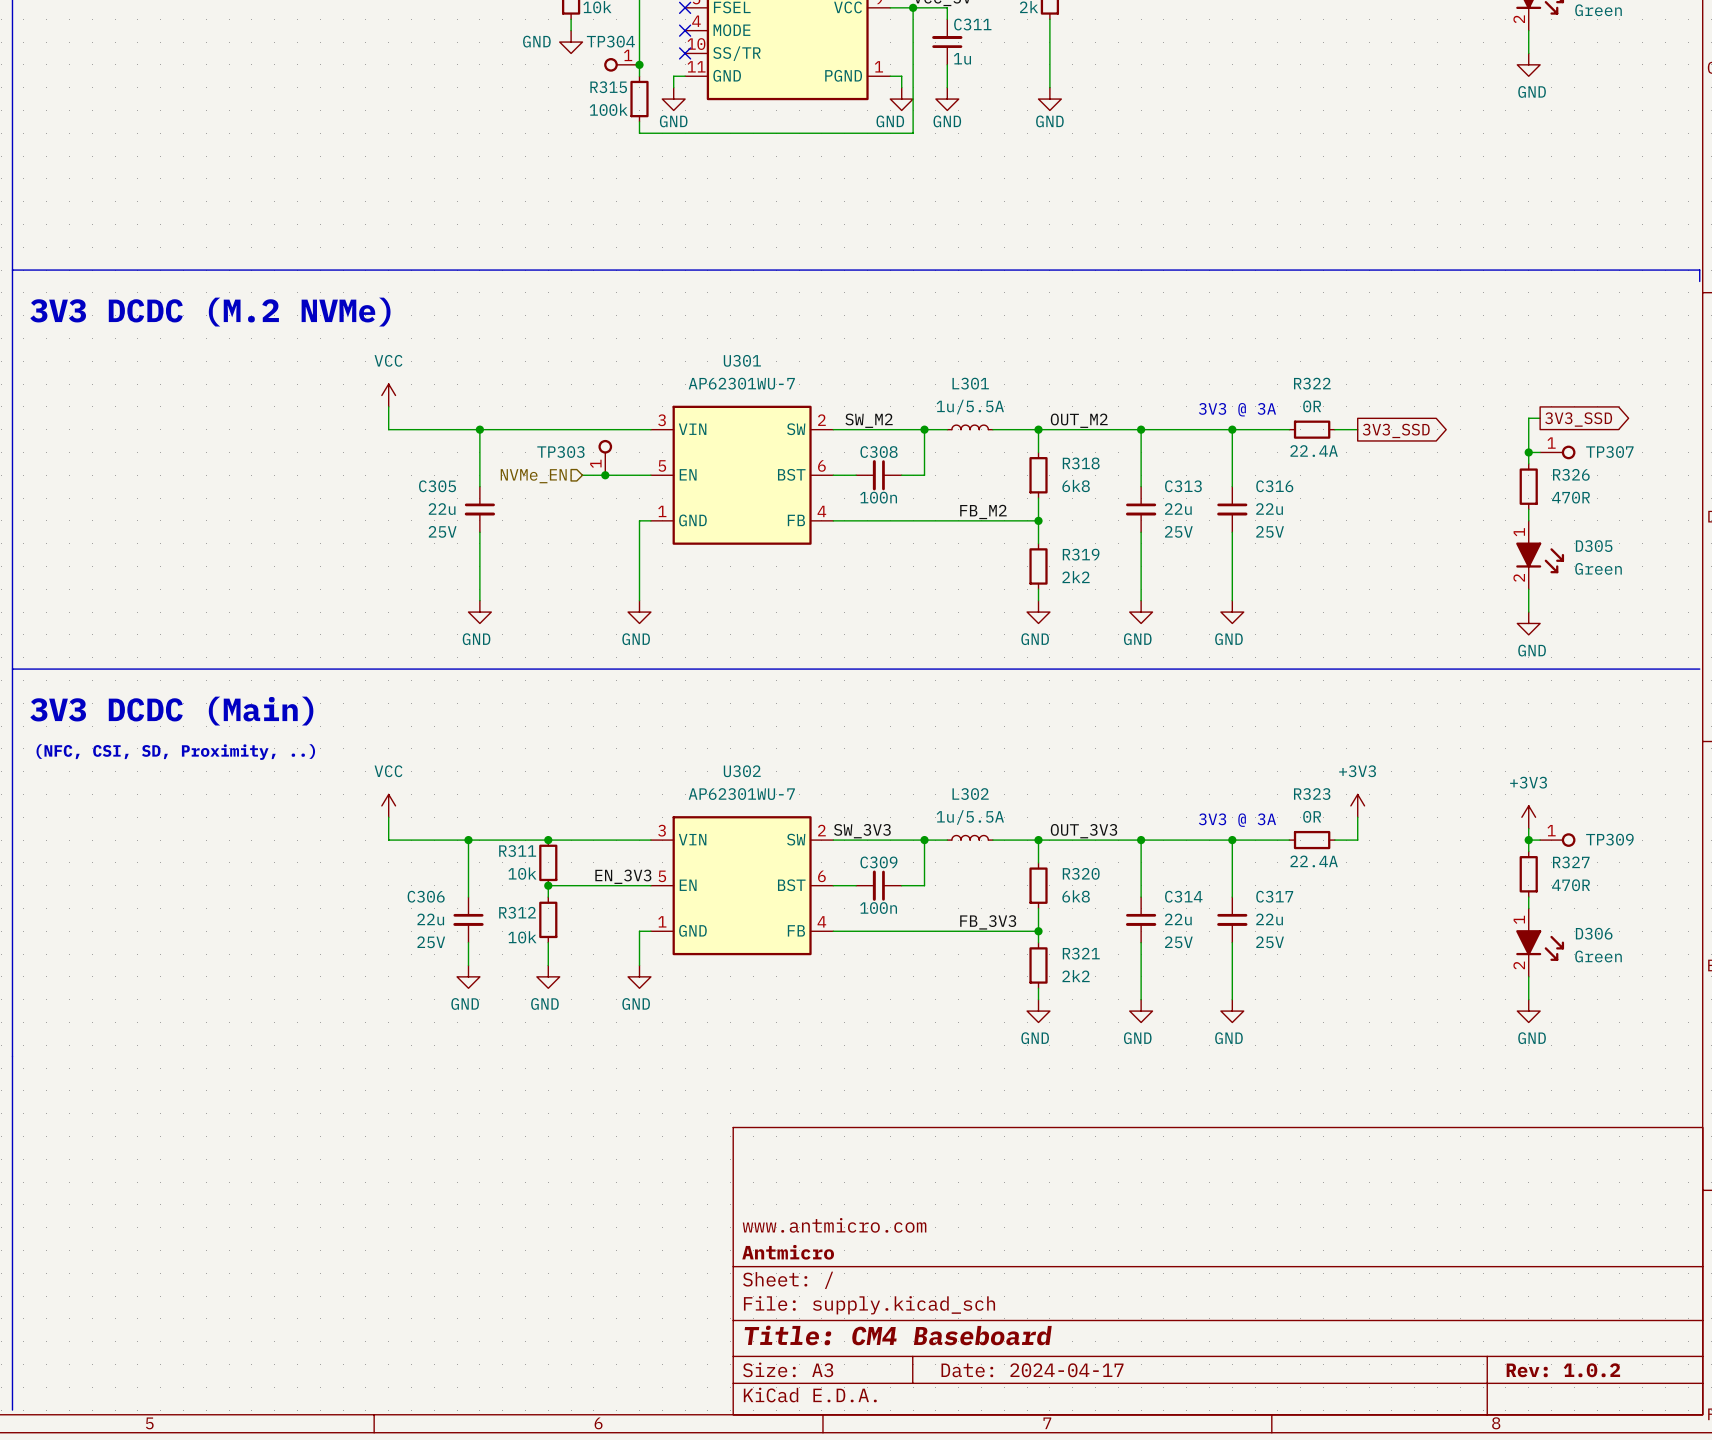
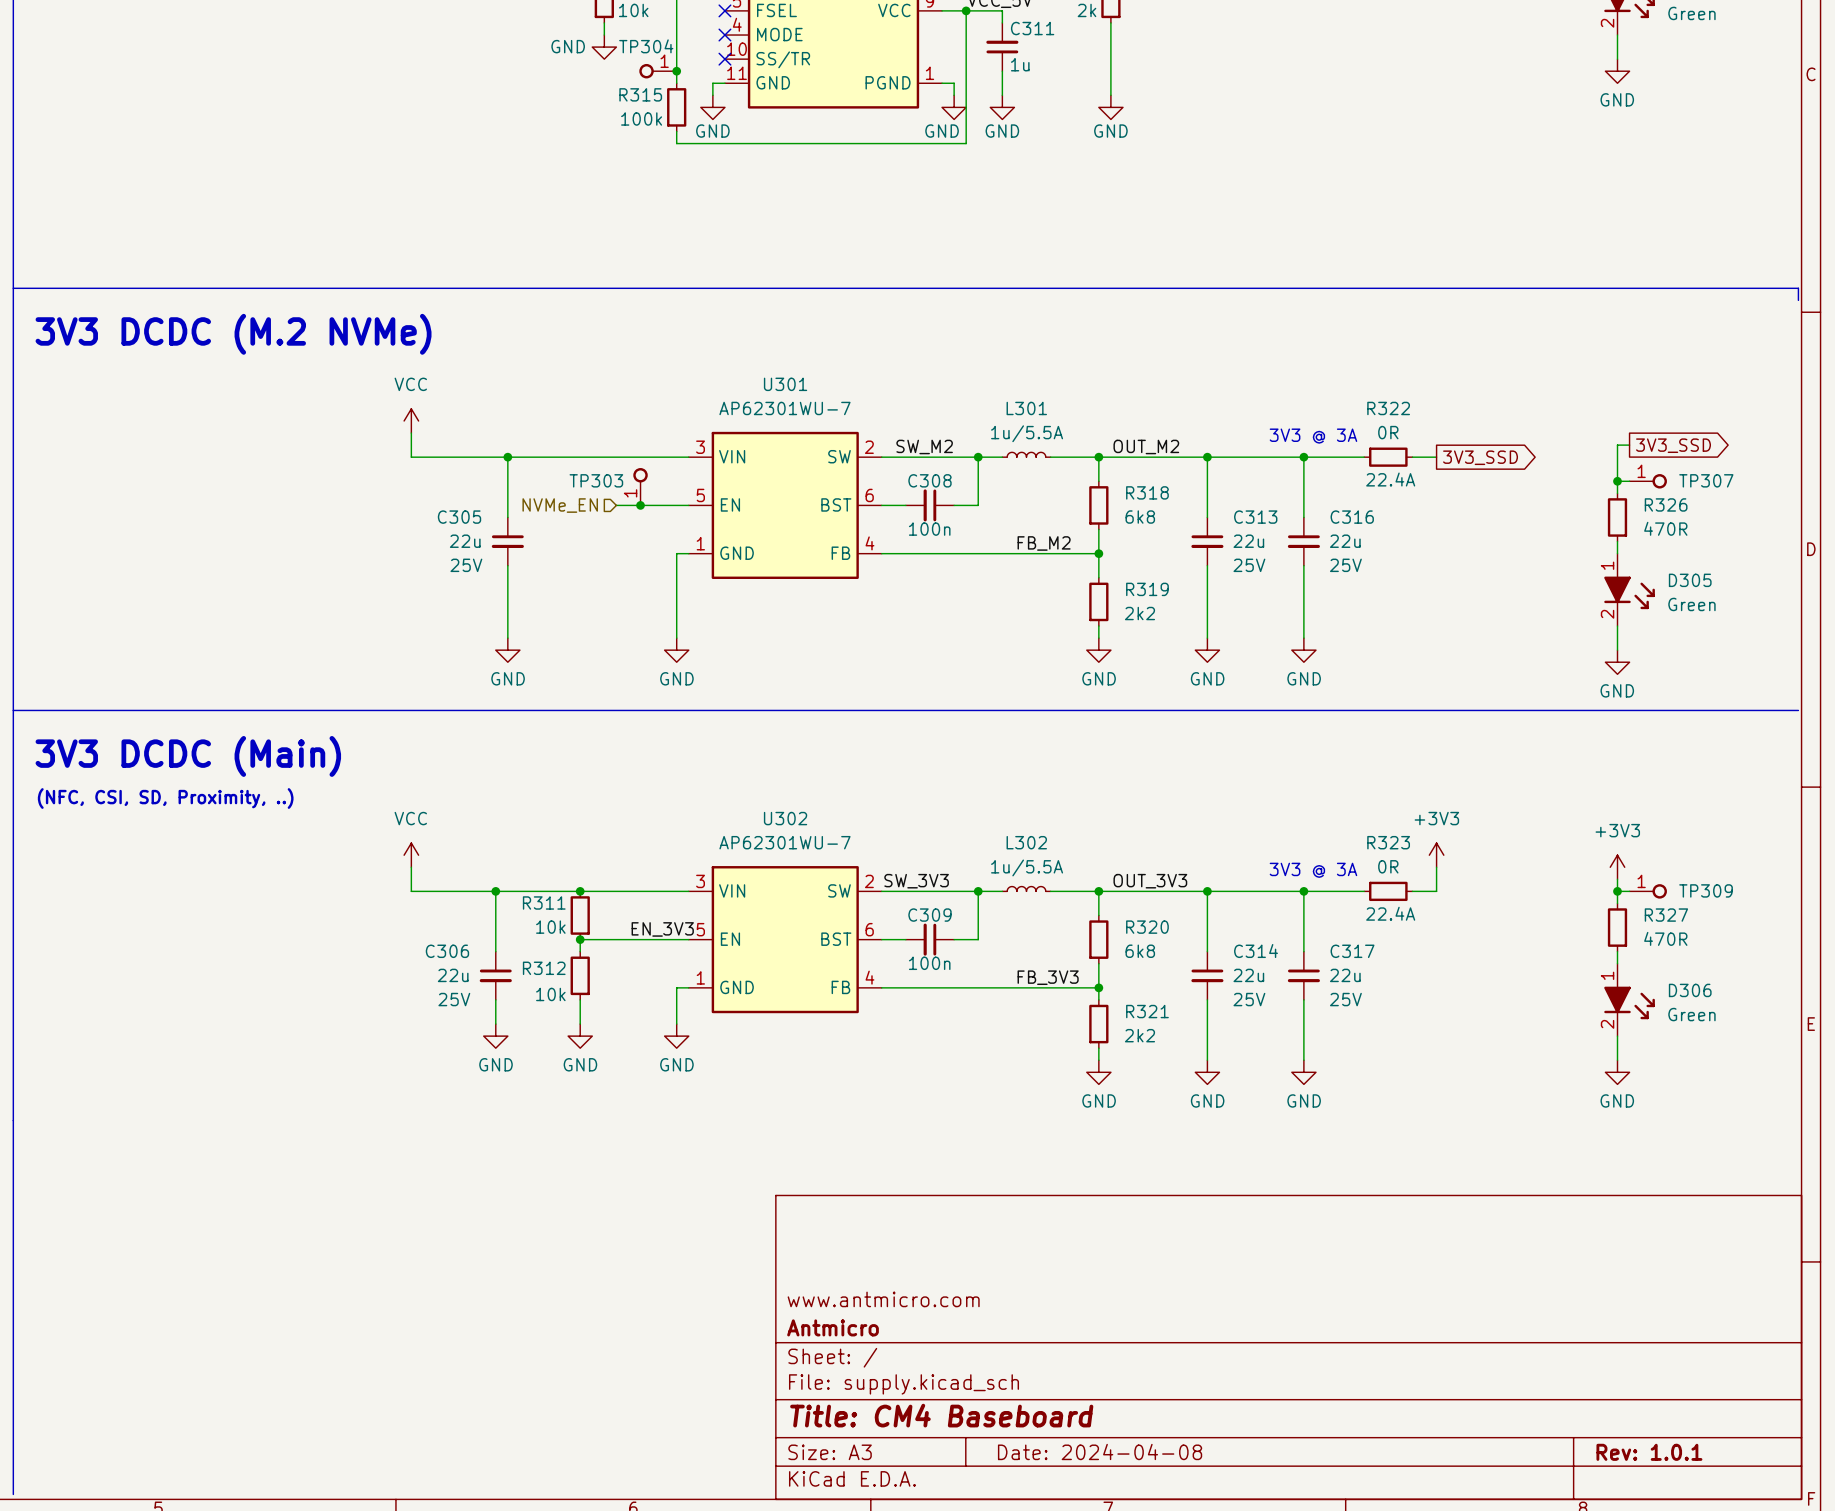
title block: Date: 2024-04-17 (1032, 1370) -> Date: 2024-04-08 (1100, 1451)
title block: Rev: 1.0.2 (1563, 1370) -> Rev: 1.0.1 (1649, 1452)

